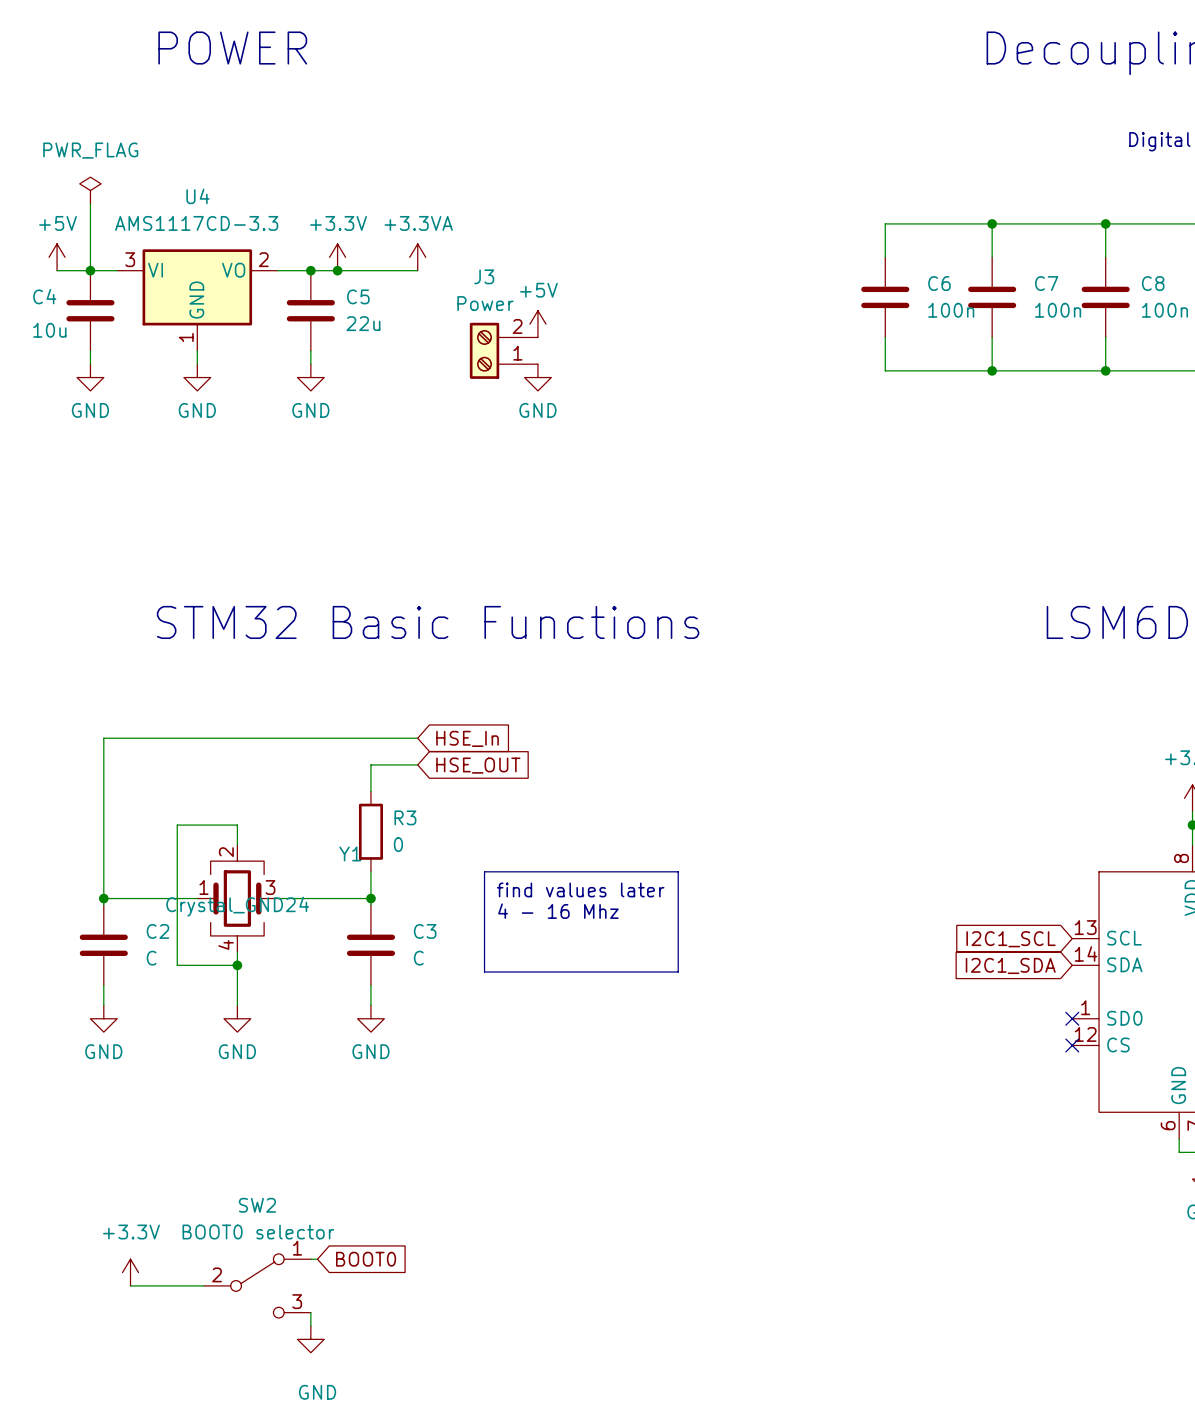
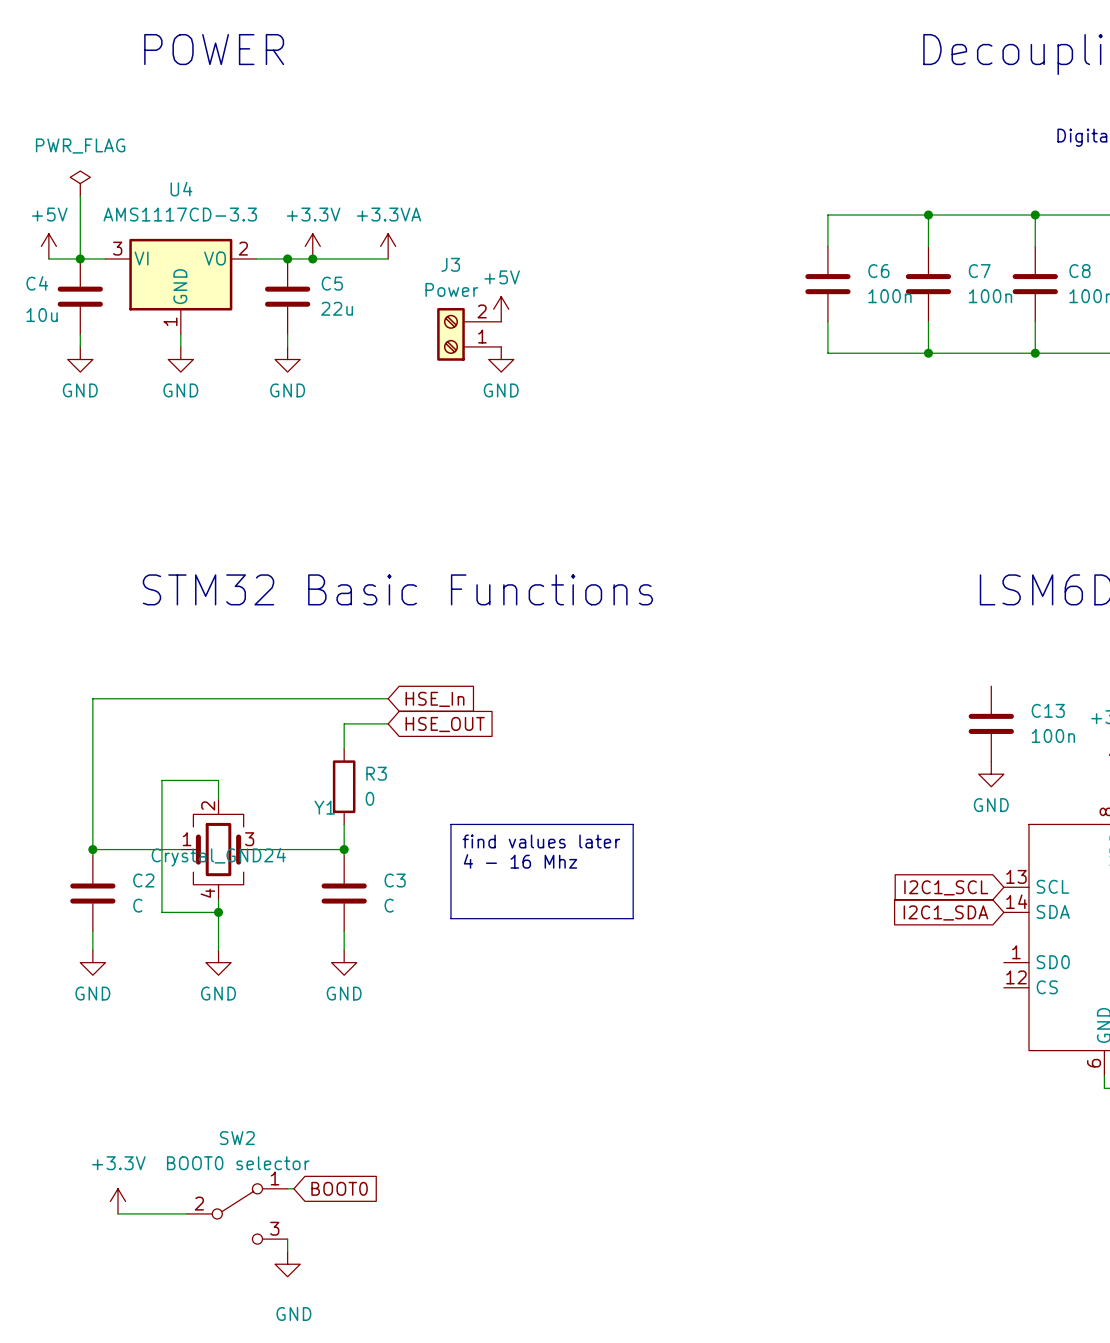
C13: none -> 100n (991, 723)
power symbol: none -> GND (991, 774)
no-connect mark: (1072, 1018) -> none
no-connect mark: (1072, 1045) -> none

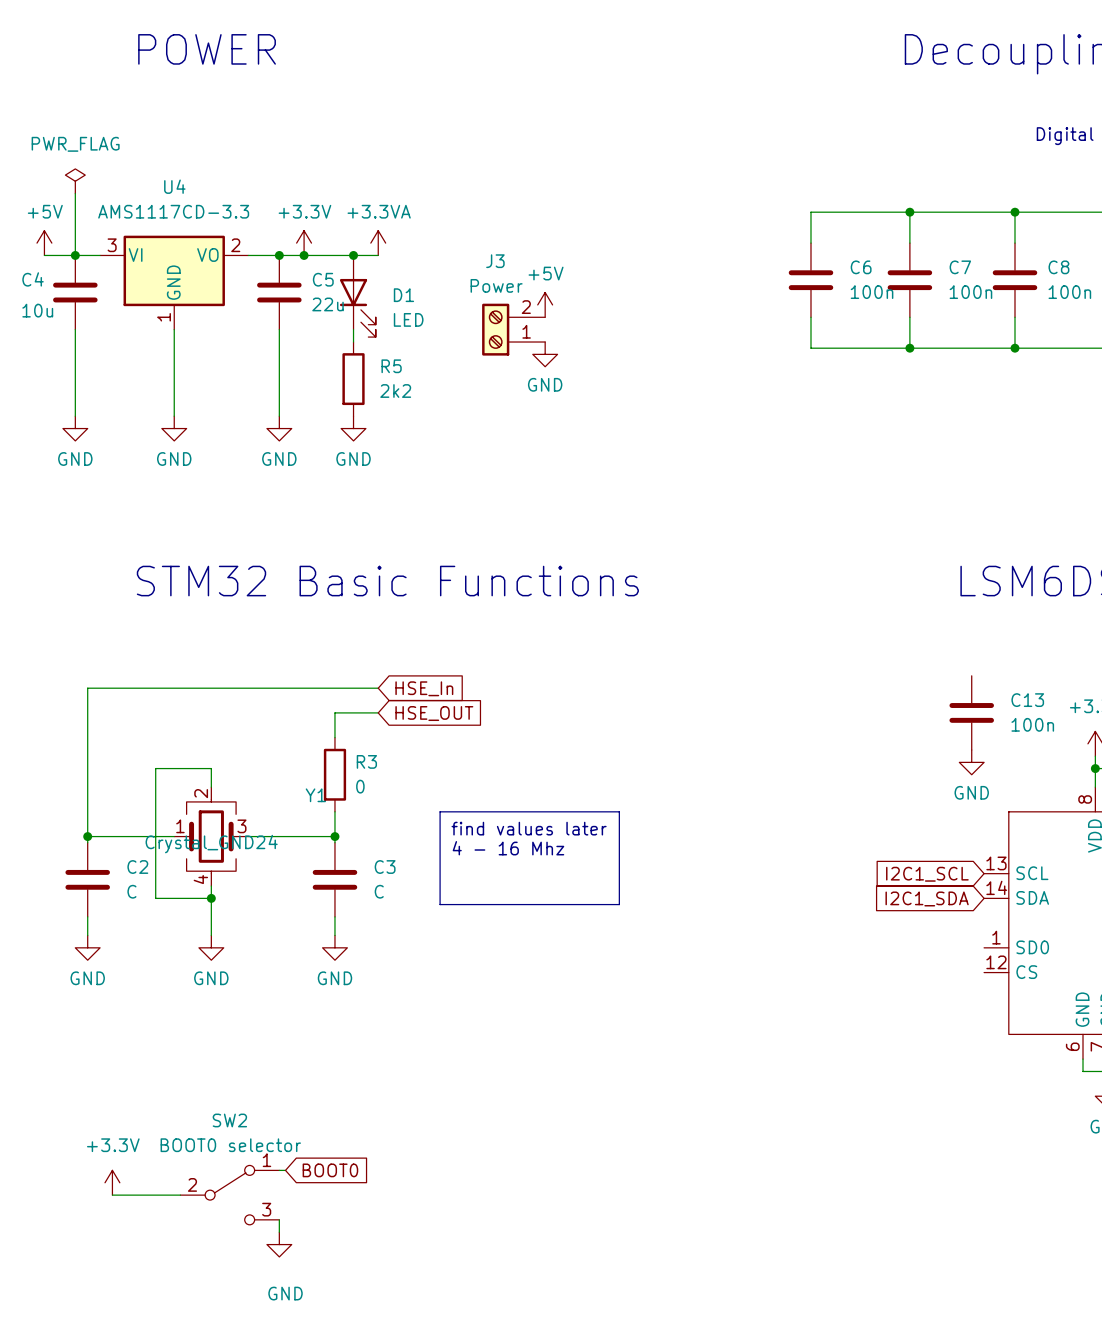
junction: none -> (353, 255)
D1: none -> LED (357, 296)
power symbol position: +5V (501, 309) -> +5V (545, 304)
wire: none -> (353, 329) (353, 342)
J3 position: (469, 334) -> (513, 329)
wire: none -> (75, 342) (75, 416)
wire: none -> (174, 342) (174, 416)
wire: none -> (279, 342) (279, 416)
power symbol: GND (80, 359) -> none
power symbol: GND (180, 359) -> none
power symbol: GND (287, 359) -> none
power symbol position: GND (501, 359) -> GND (545, 354)
R5: none -> 2k2 (353, 379)
power symbol: none -> GND (75, 428)
power symbol: none -> GND (174, 428)
power symbol: none -> GND (279, 428)
power symbol: none -> GND (353, 428)

